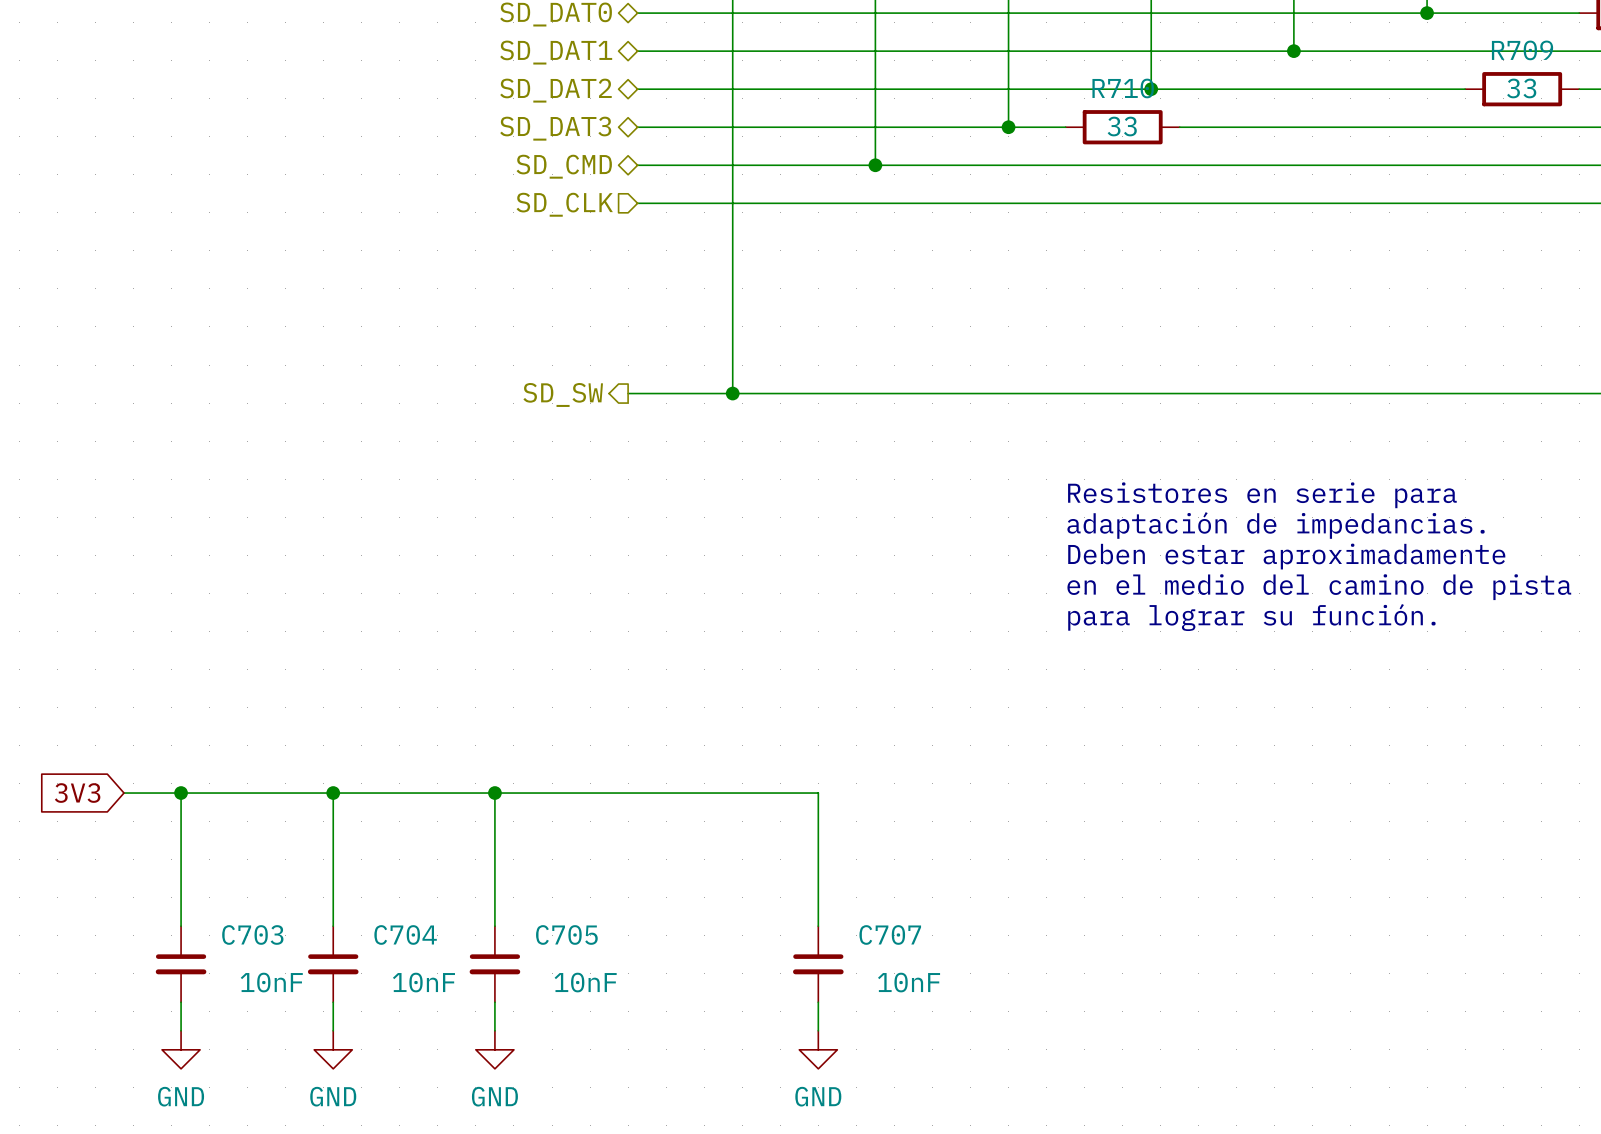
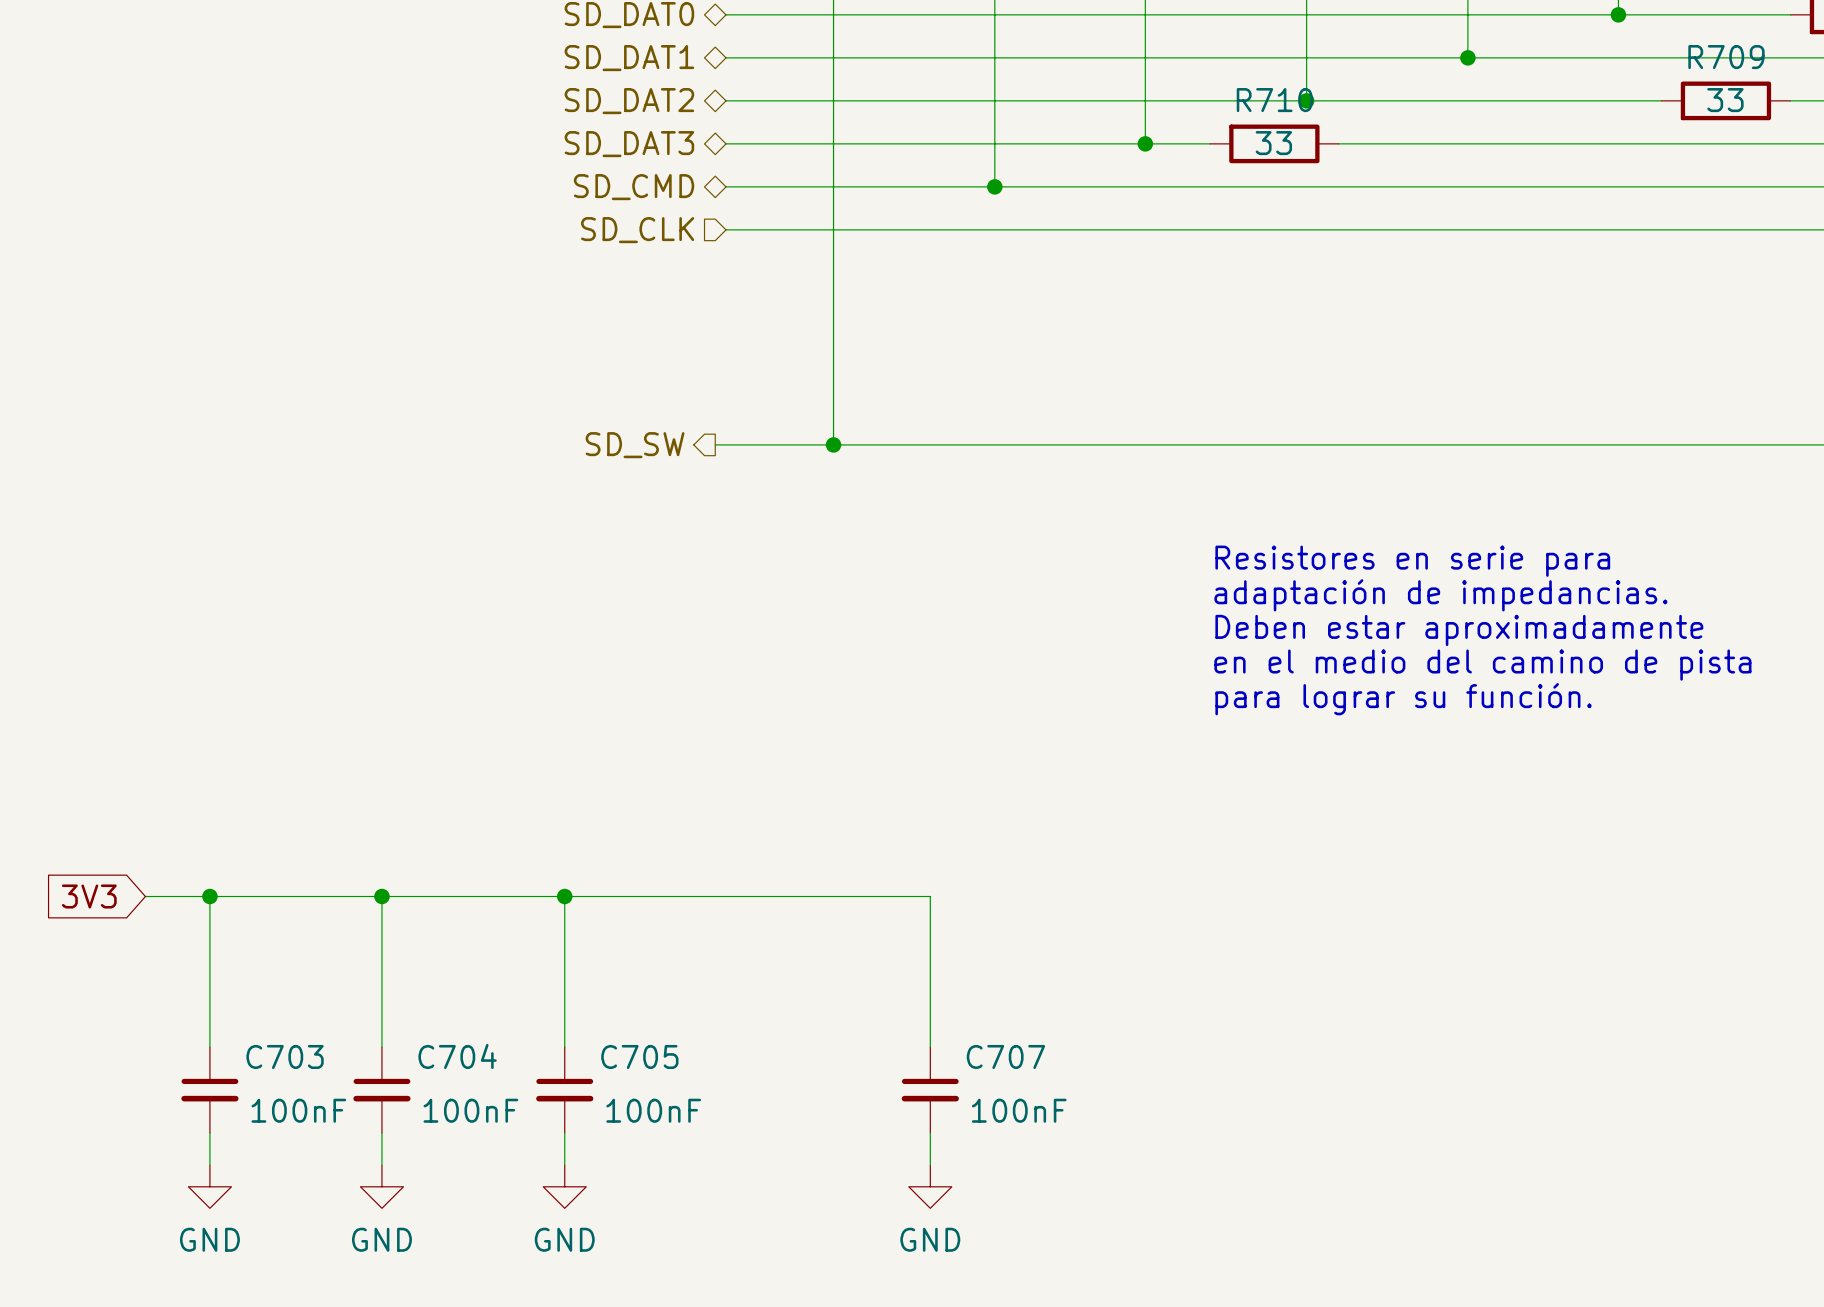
C703 value: 10nF (271, 982) -> 100nF (298, 1110)
C704 value: 10nF (423, 982) -> 100nF (470, 1110)
C705 value: 10nF (585, 982) -> 100nF (653, 1110)
C707 value: 10nF (909, 982) -> 100nF (1019, 1110)

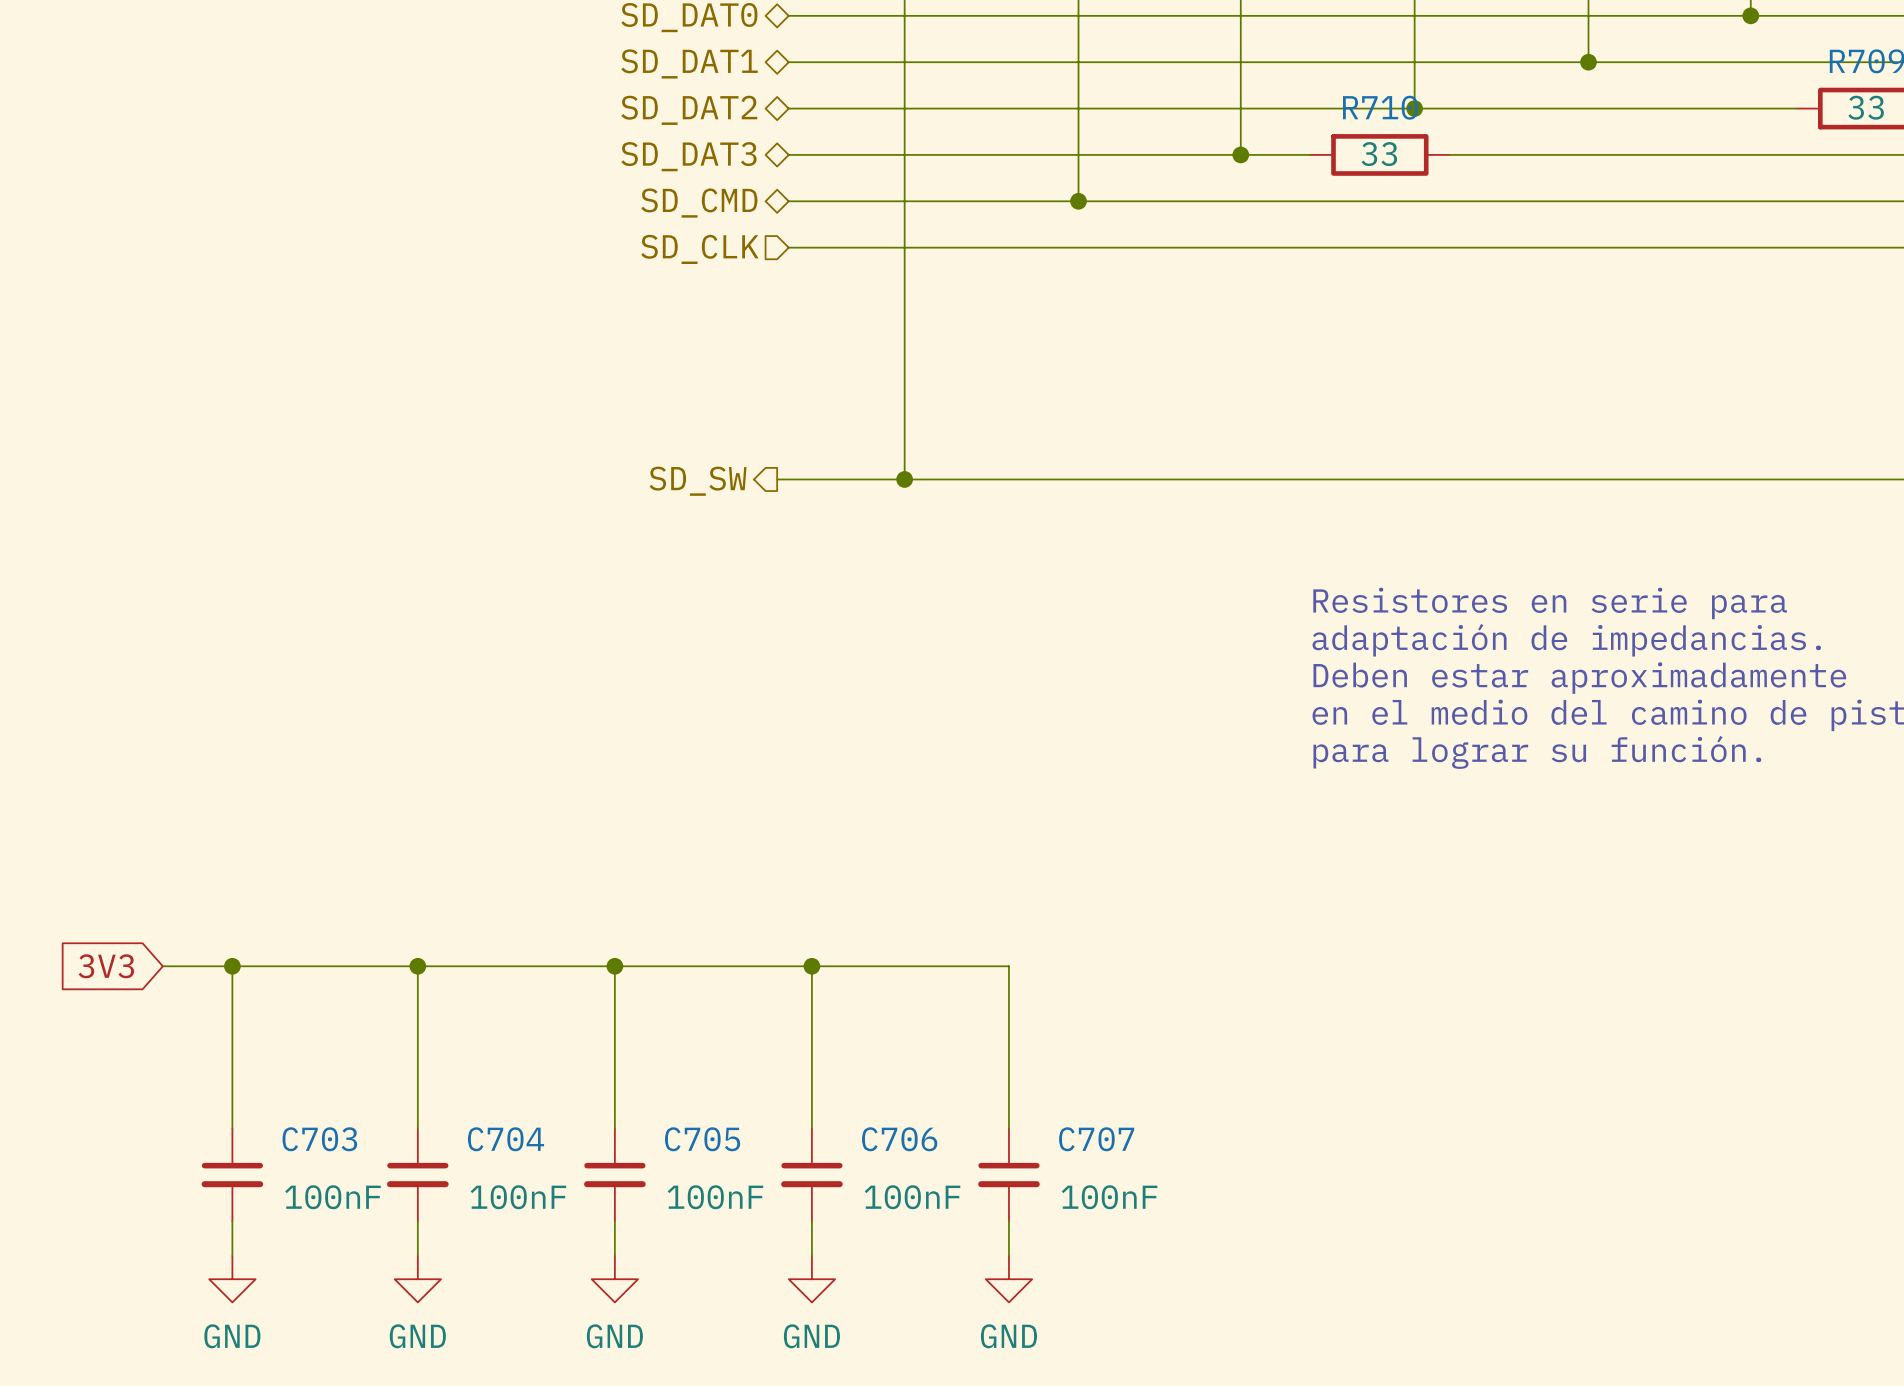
wire: none -> (811, 966) (811, 1128)
junction: none -> (811, 966)
C706: none -> 100nF (811, 1174)
wire: none -> (811, 1221) (811, 1256)
power symbol: none -> GND (811, 1279)

